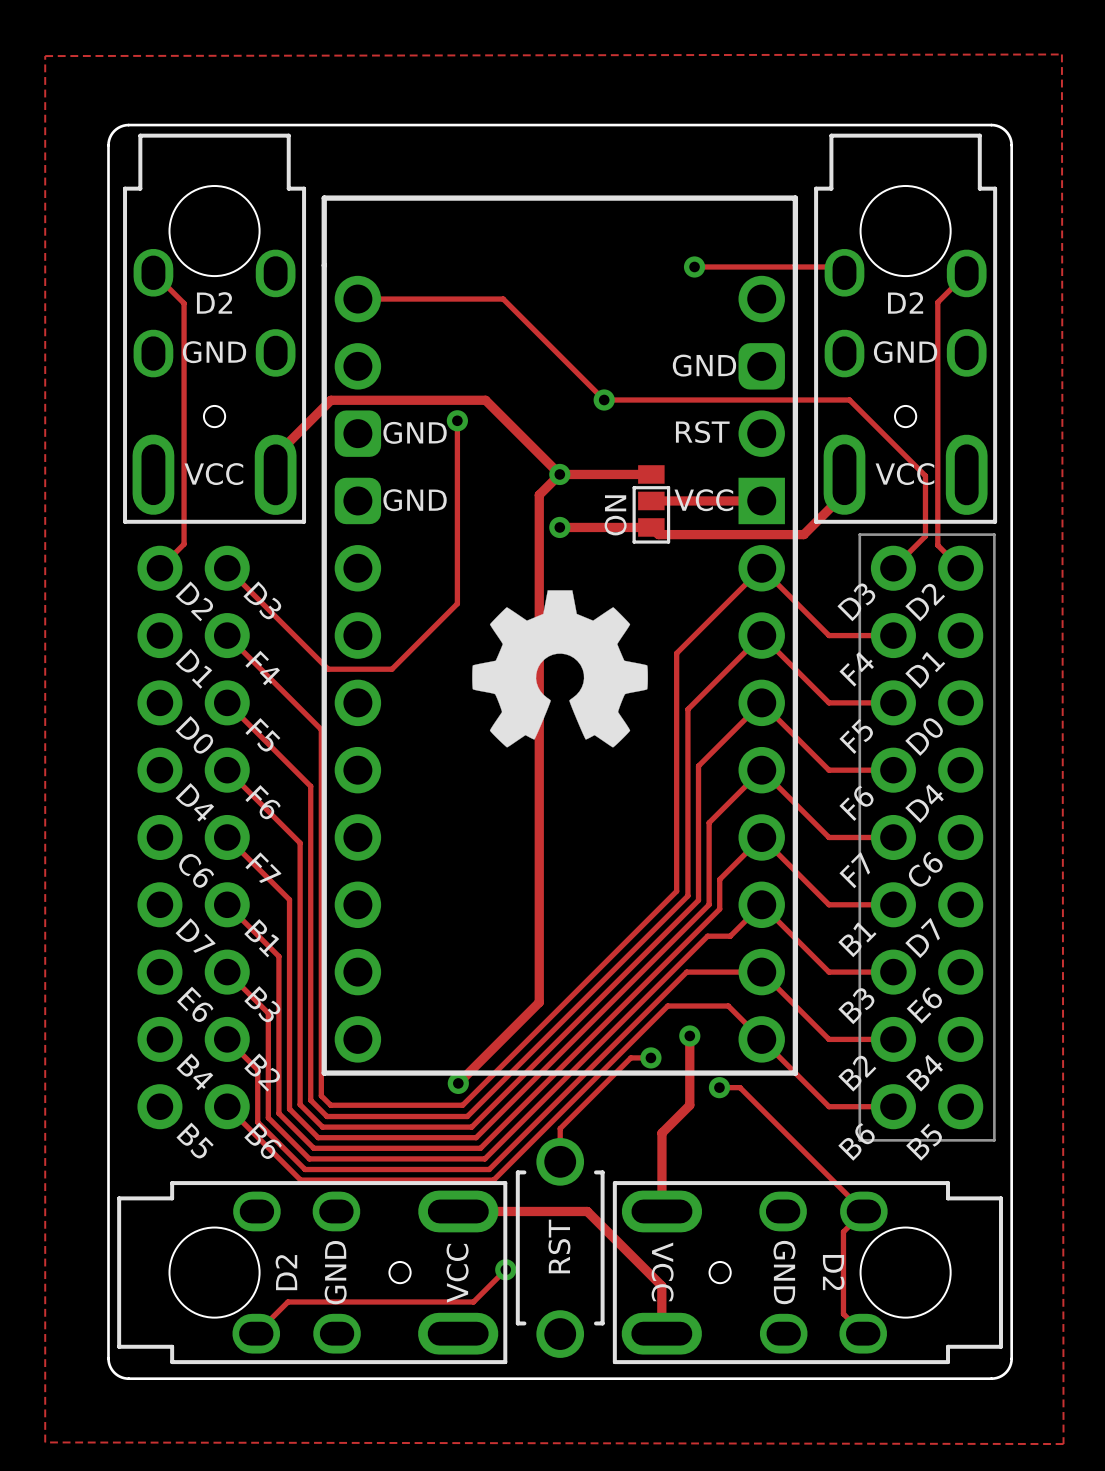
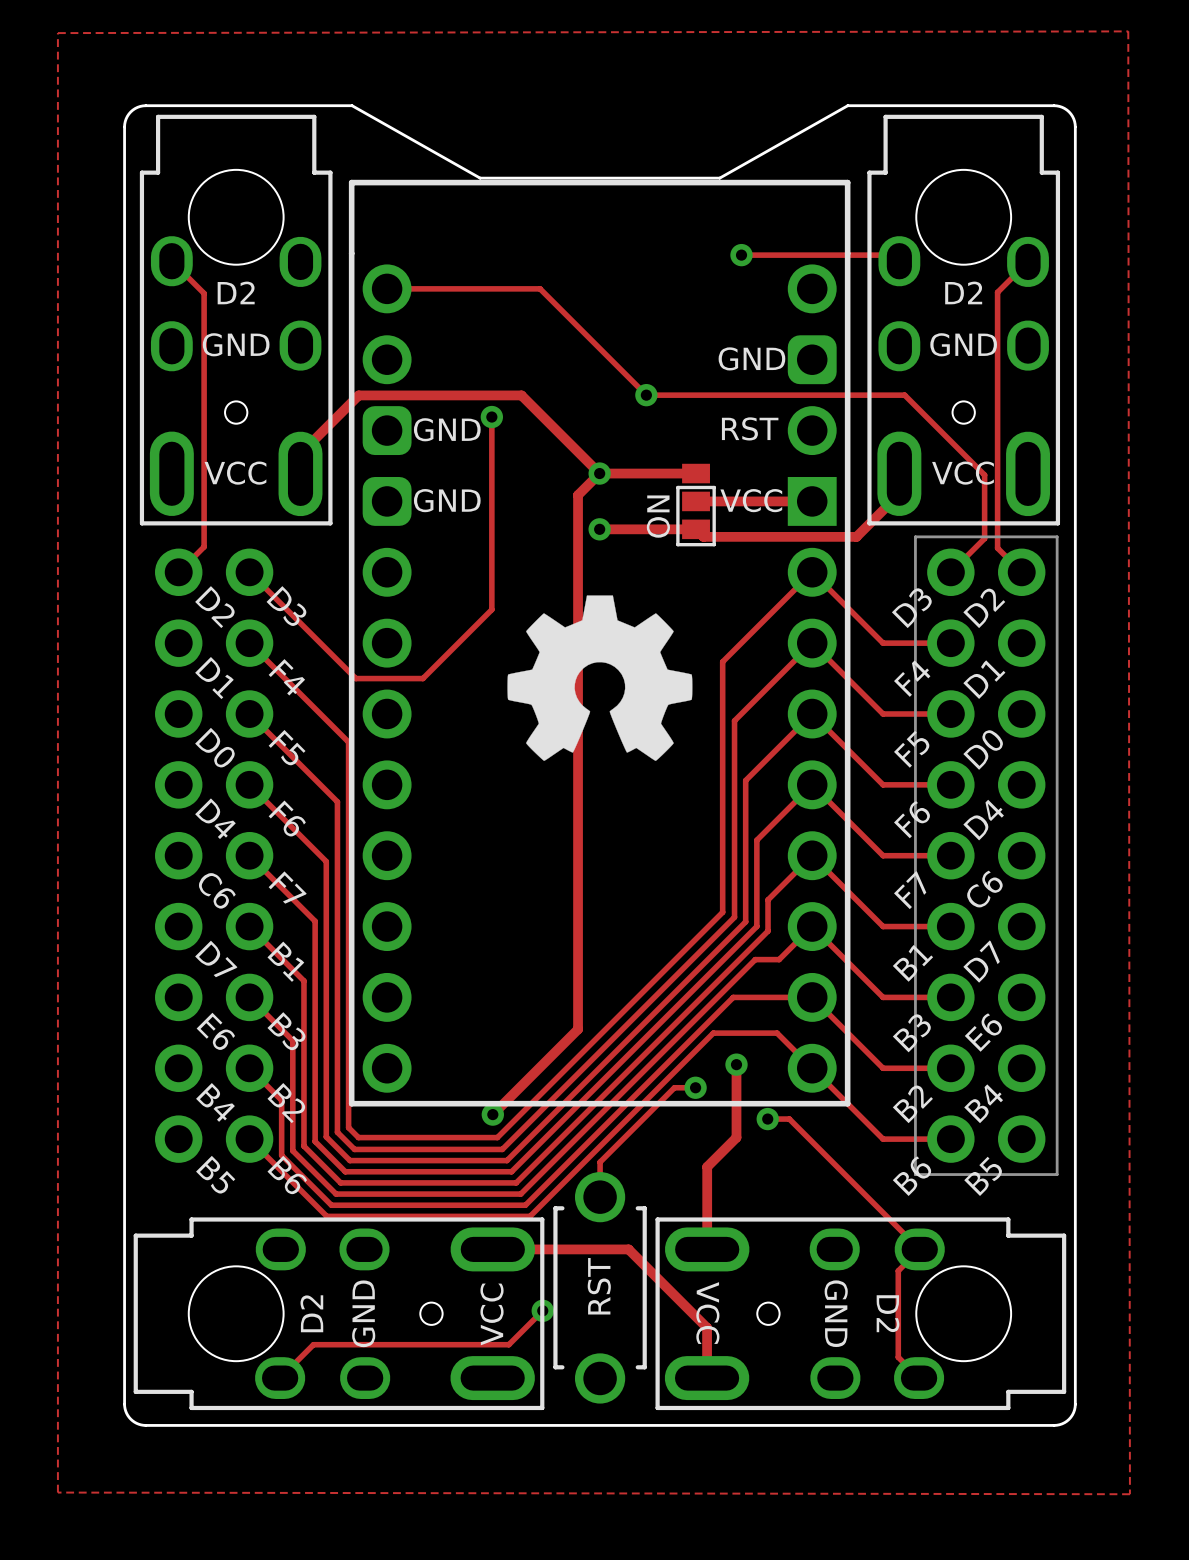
board edge: (324, 125) (795, 125) -> (352, 105) (480, 178) (719, 178) (847, 105)

